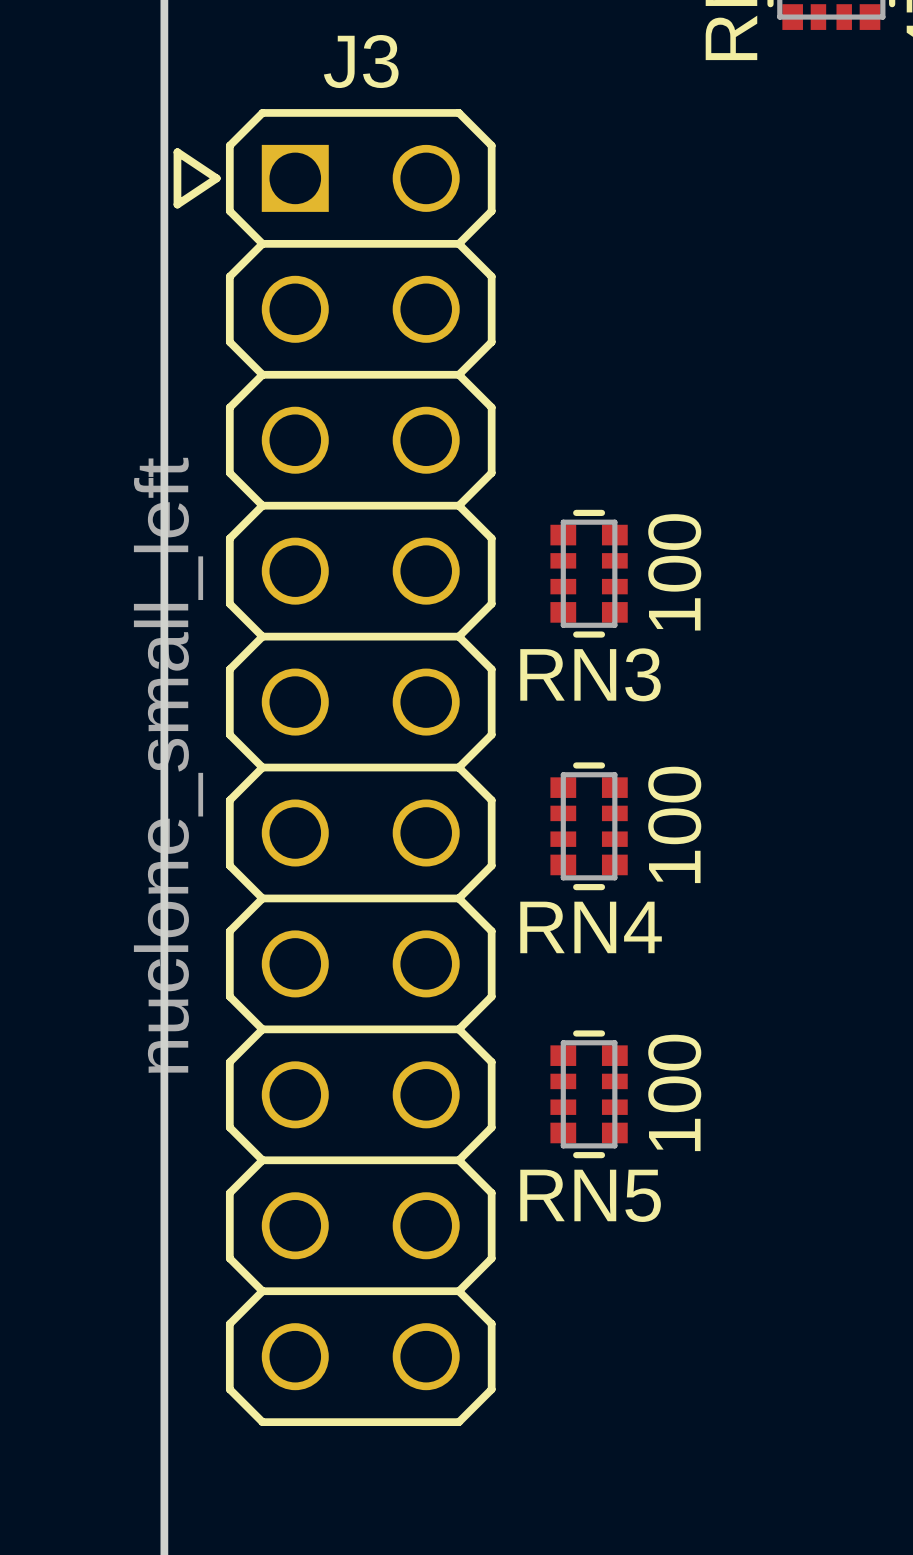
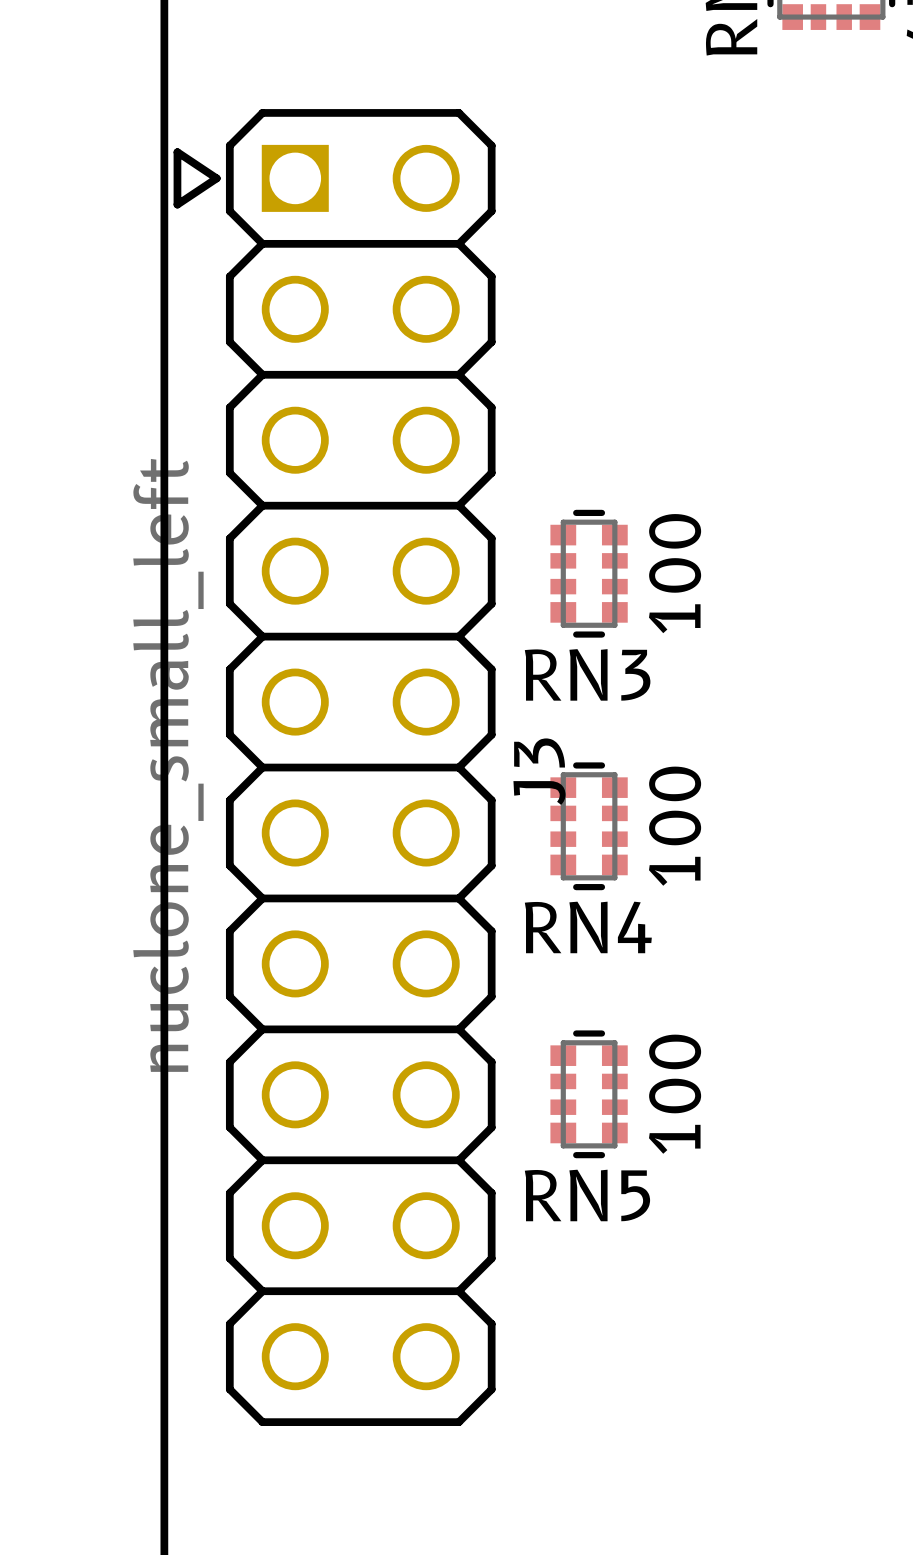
J3 name rotation: 0° (361, 61) -> 90° counterclockwise (539, 771)
J3 name position: J3 (361, 61) -> J3 (539, 771)

